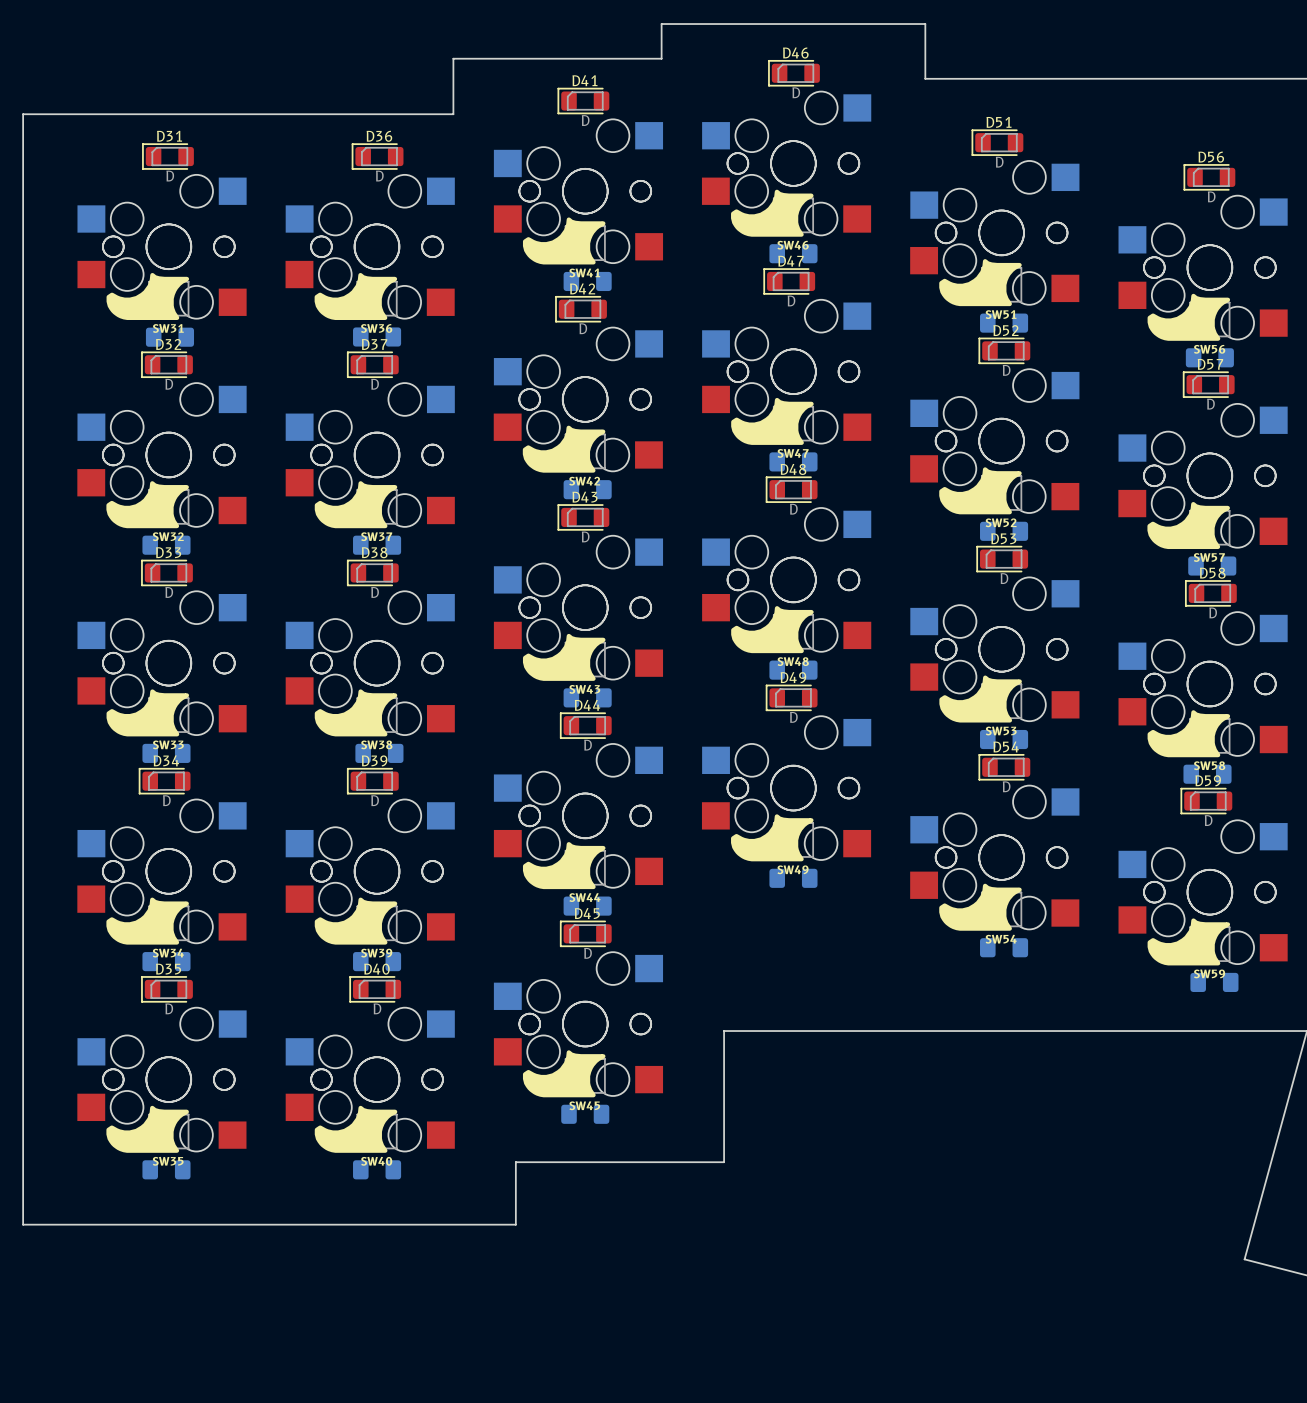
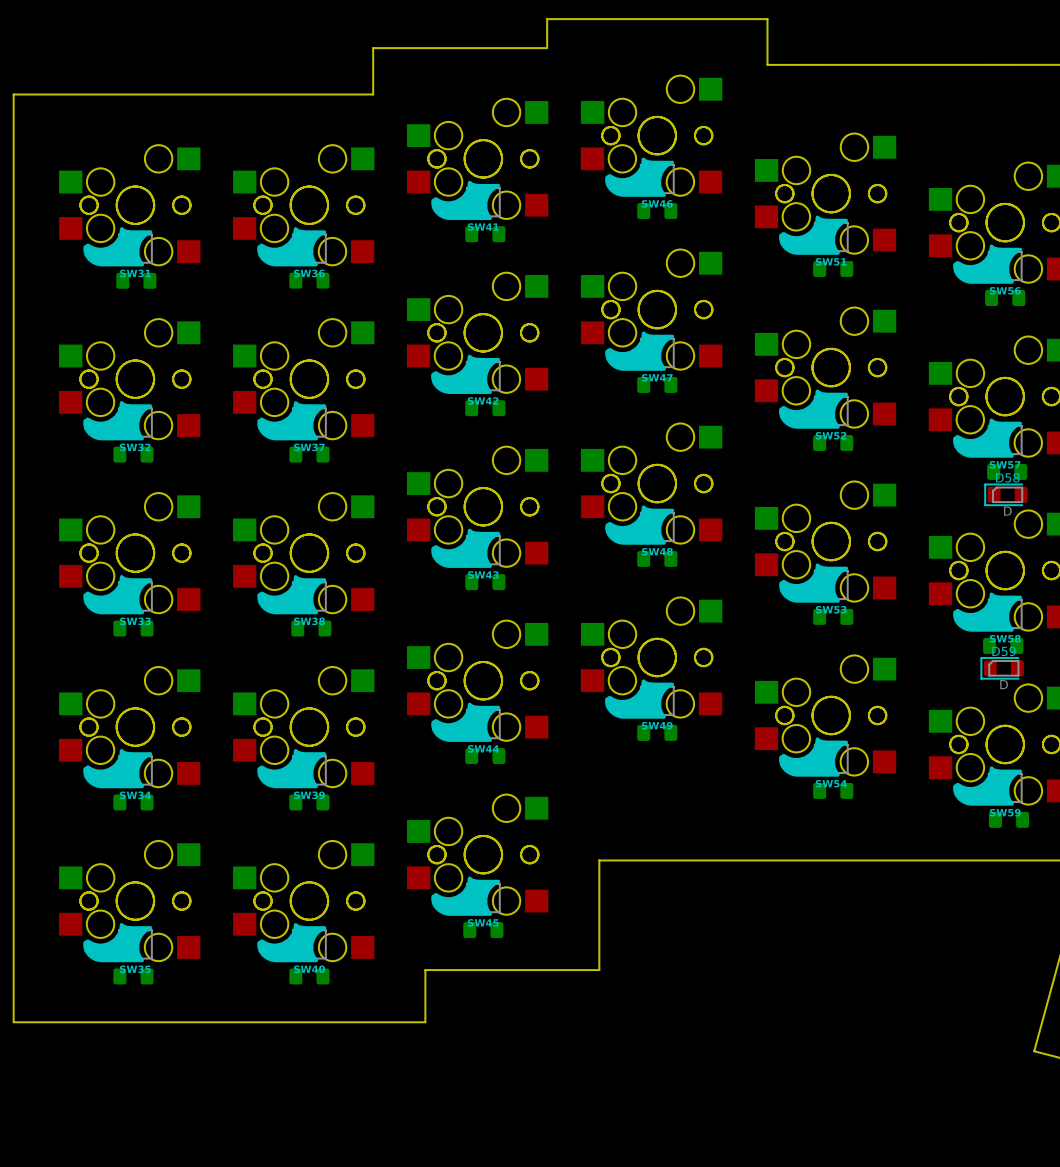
D46: D (794, 73) -> none
D41: D (583, 101) -> none
D51: D (997, 142) -> none
D31: D (168, 156) -> none
D36: D (377, 156) -> none
D56: D (1209, 177) -> none
D47: D (789, 281) -> none
D42: D (581, 309) -> none
D52: D (1004, 350) -> none
D32: D (167, 364) -> none
D37: D (372, 364) -> none
D57: D (1208, 384) -> none
D48: D (791, 489) -> none
D43: D (583, 517) -> none
D53: D (1002, 559) -> none
D33: D (167, 572) -> none
D38: D (372, 572) -> none
D49: D (791, 697) -> none
D44: D (585, 725) -> none
D54: D (1004, 767) -> none
D34: D (164, 781) -> none
D39: D (372, 781) -> none
D45: D (585, 933) -> none
D35: D (167, 989) -> none
D40: D (375, 989) -> none

